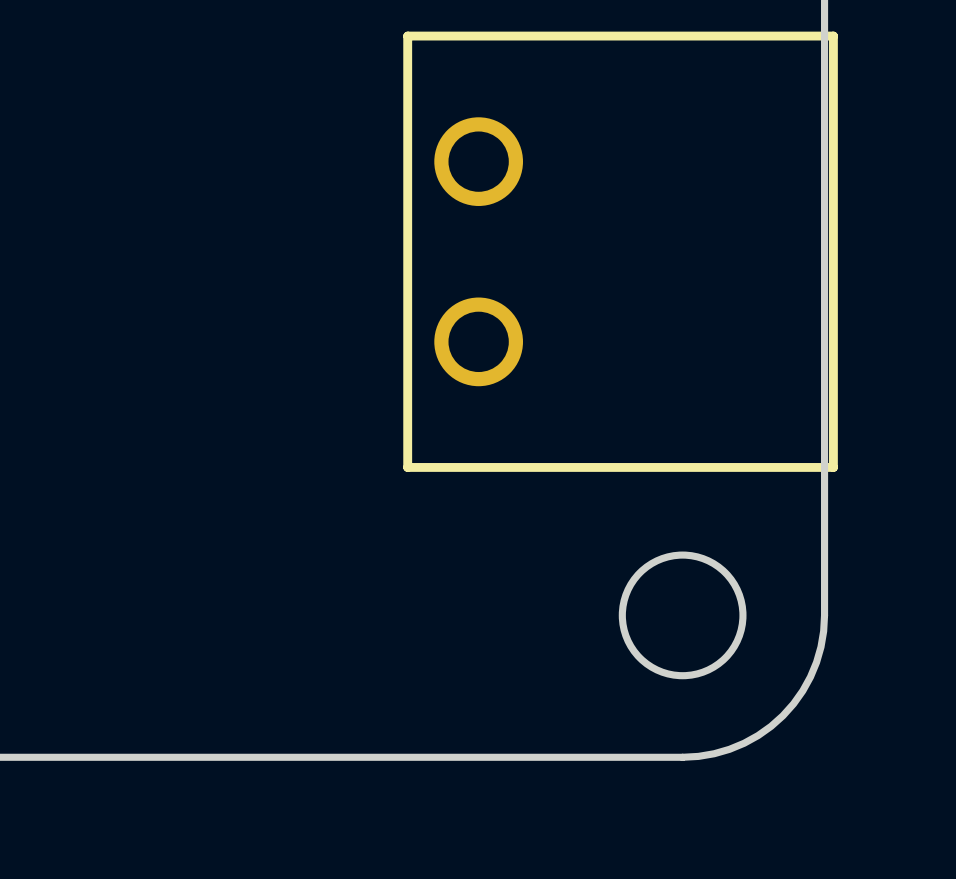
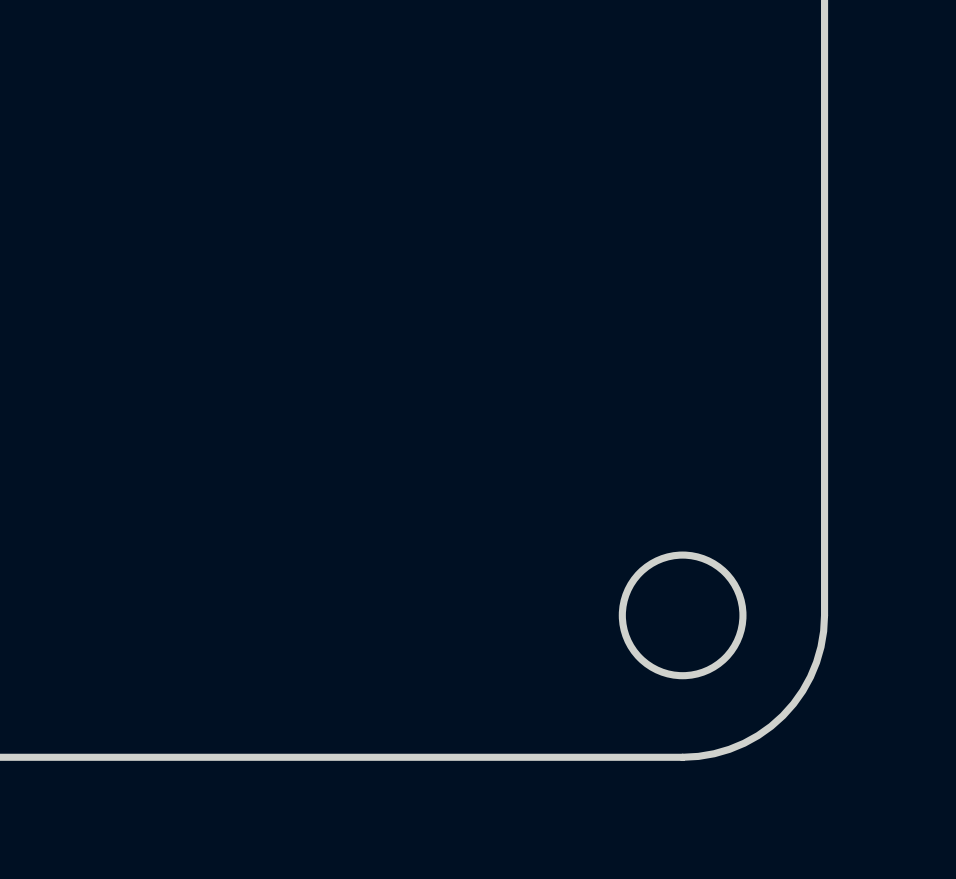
part: (620, 251) -> none

